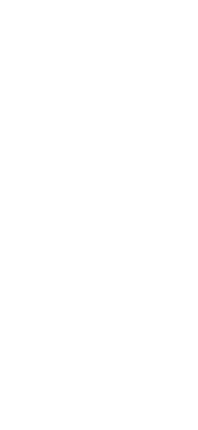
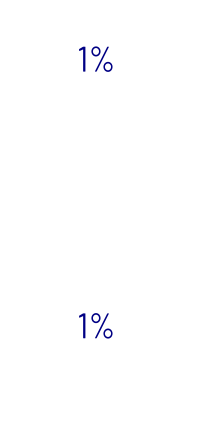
text: none -> 1% (95, 59)
text: none -> 1% (95, 325)

